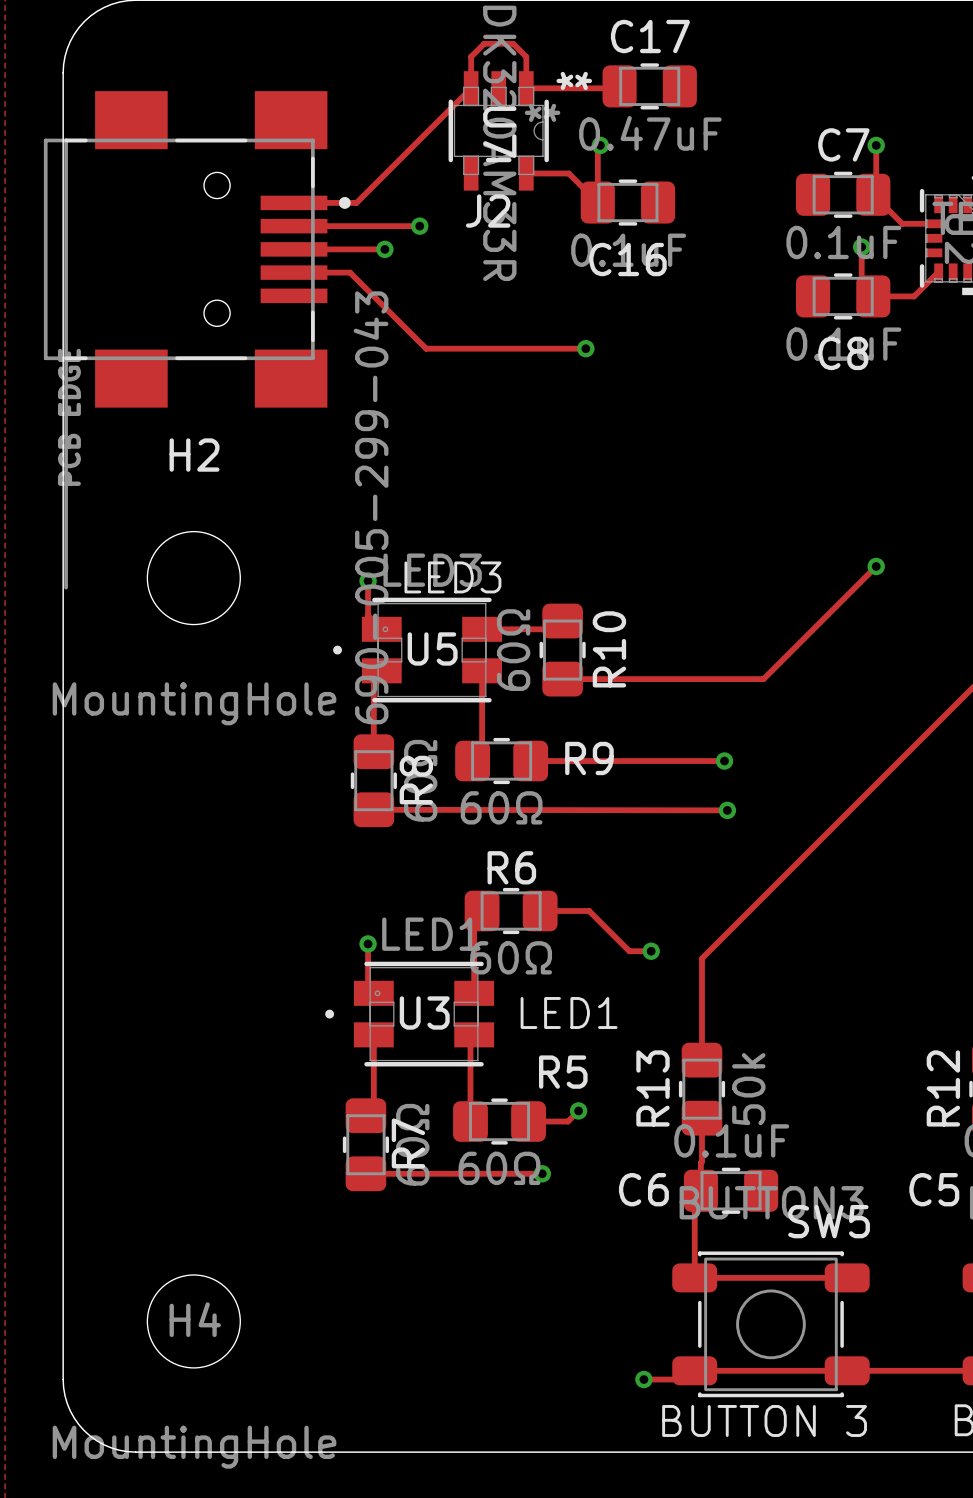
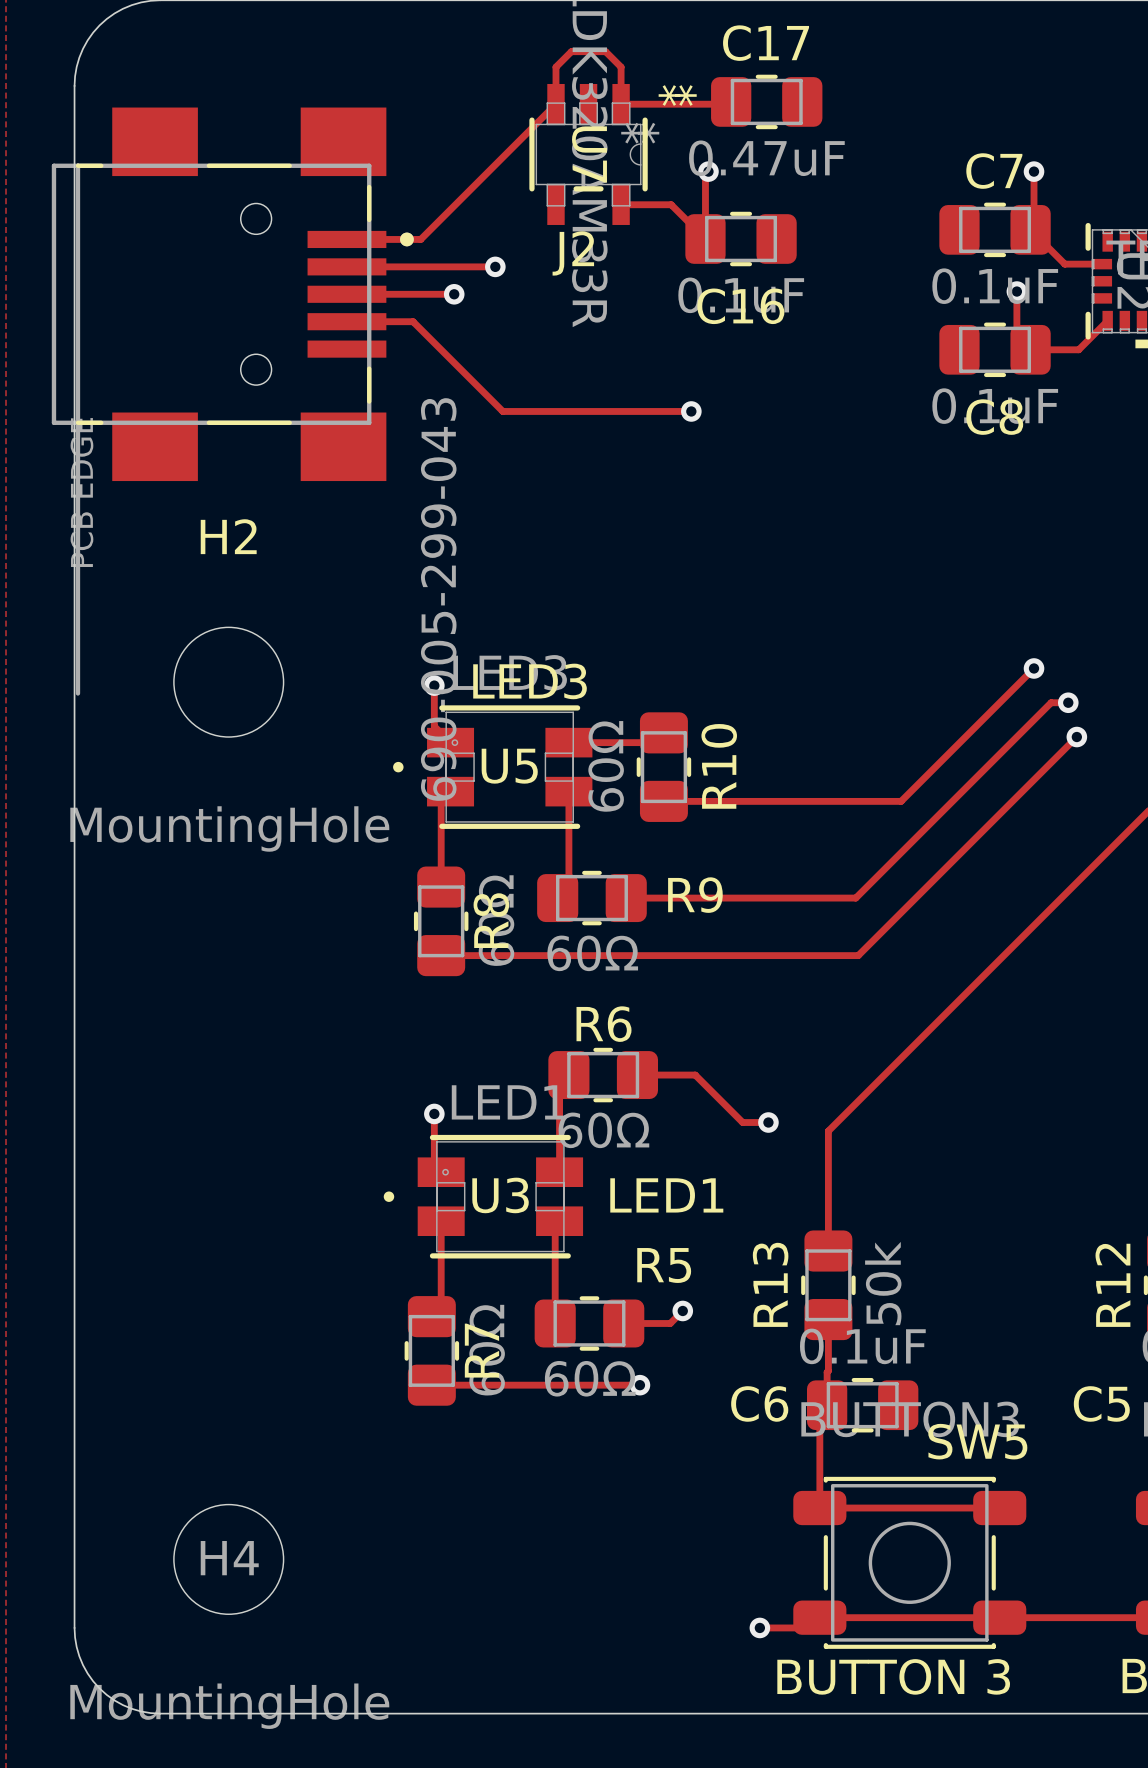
track: none -> (1068, 702) (1051, 702) (855, 898)
via: none -> (1068, 702)
via: none -> (1076, 737)
via: (724, 761) -> none
track: (373, 809) (727, 809) -> (441, 955) (858, 955) (1076, 737)
via: (727, 810) -> none

